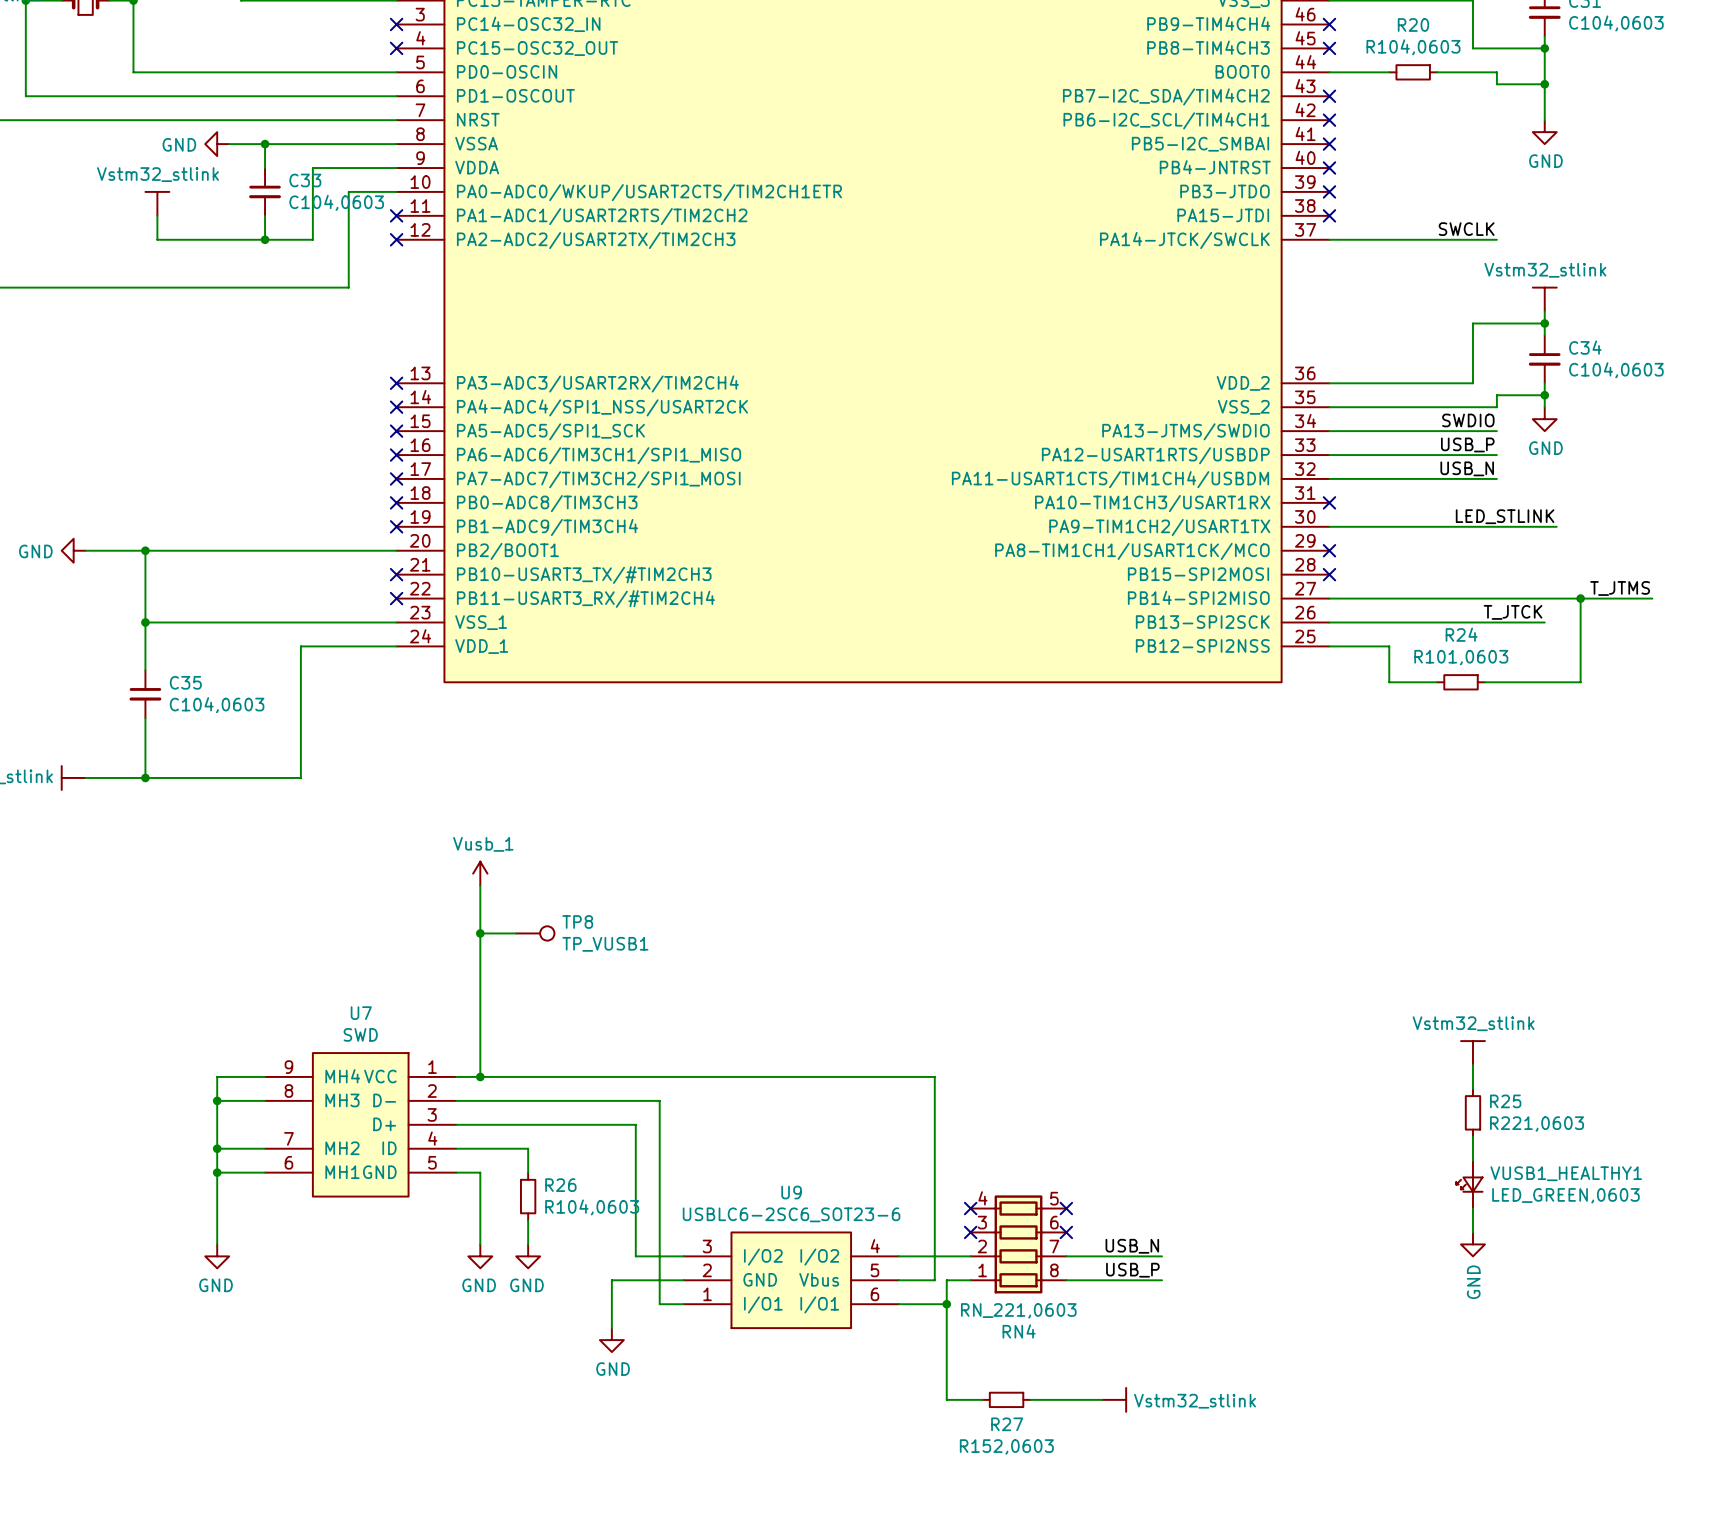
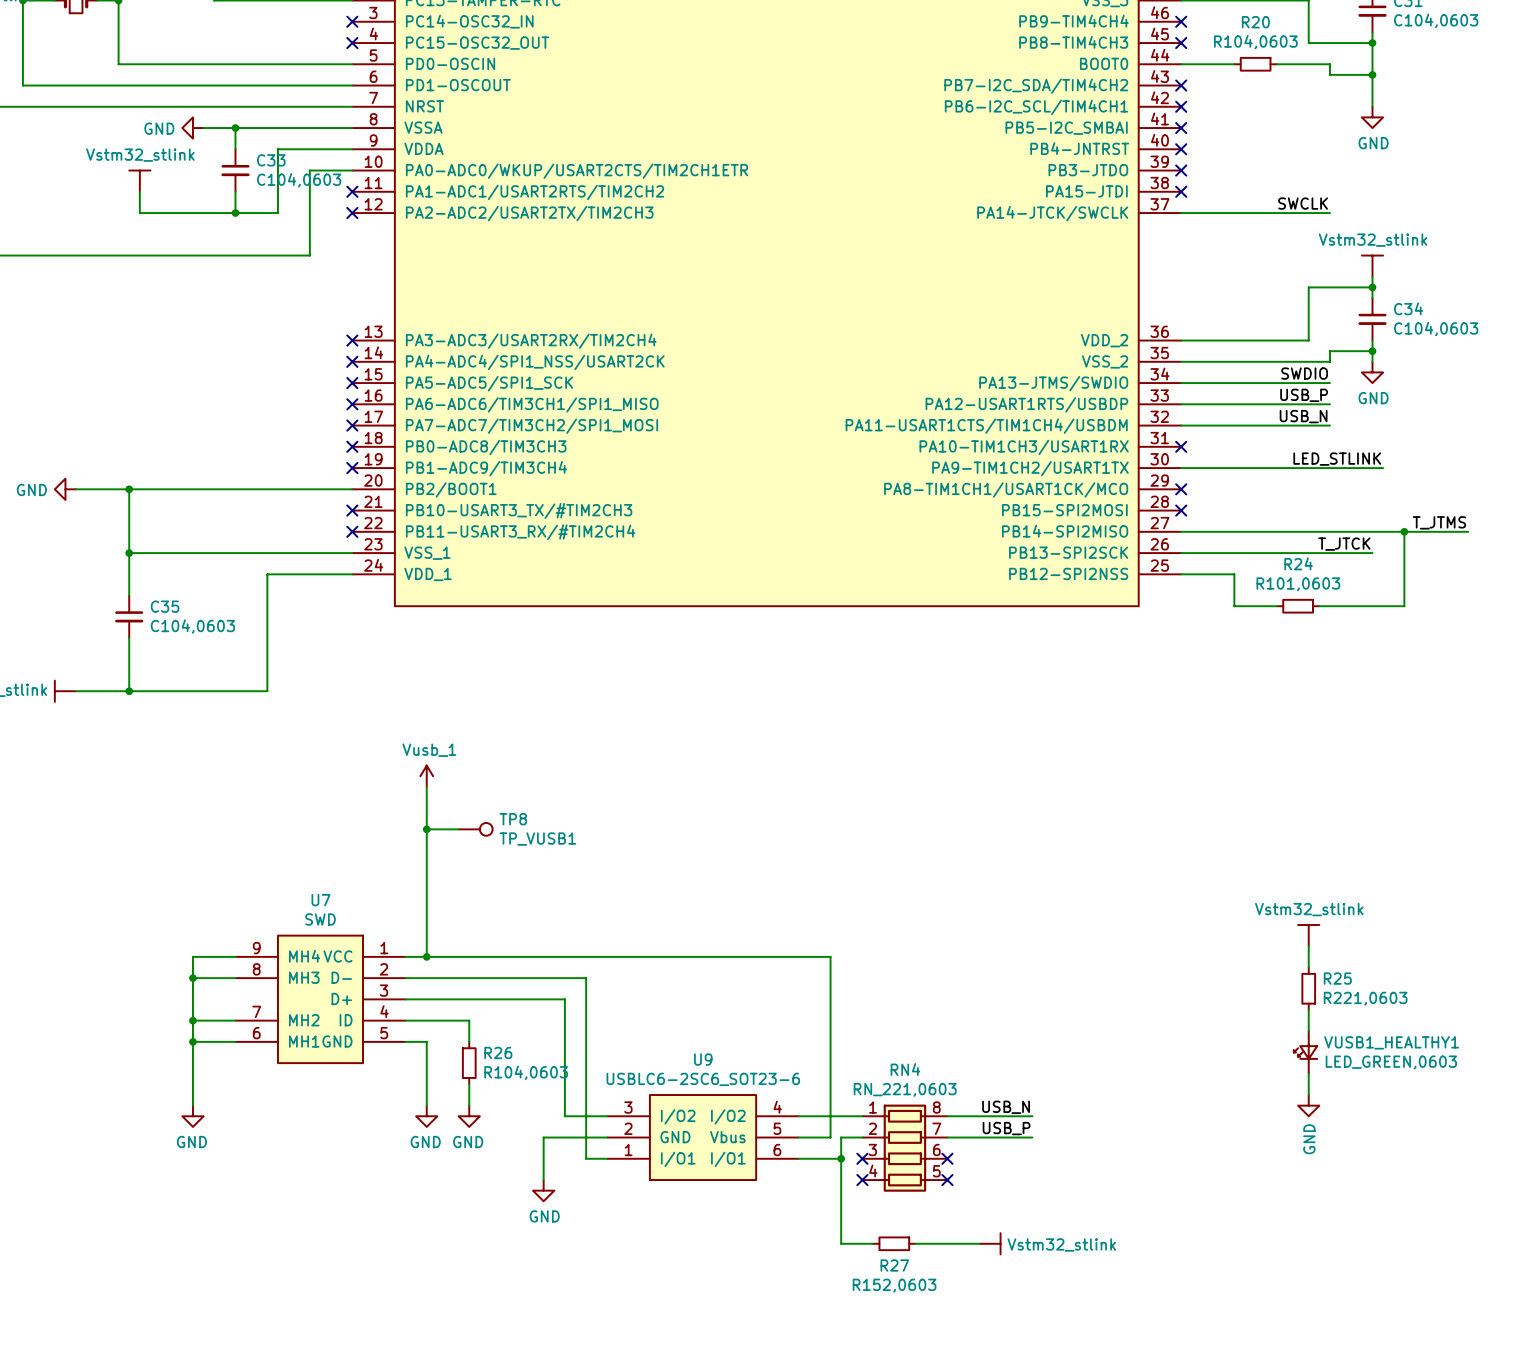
no-connect mark: (970, 1208) -> none
no-connect mark: (1066, 1208) -> none
no-connect mark: (970, 1232) -> none
no-connect mark: (1066, 1232) -> none
RN4 flip: as is (1018, 1244) -> up-down (904, 1148)
no-connect mark: none -> (862, 1158)
no-connect mark: none -> (947, 1158)
no-connect mark: none -> (862, 1180)
no-connect mark: none -> (947, 1180)

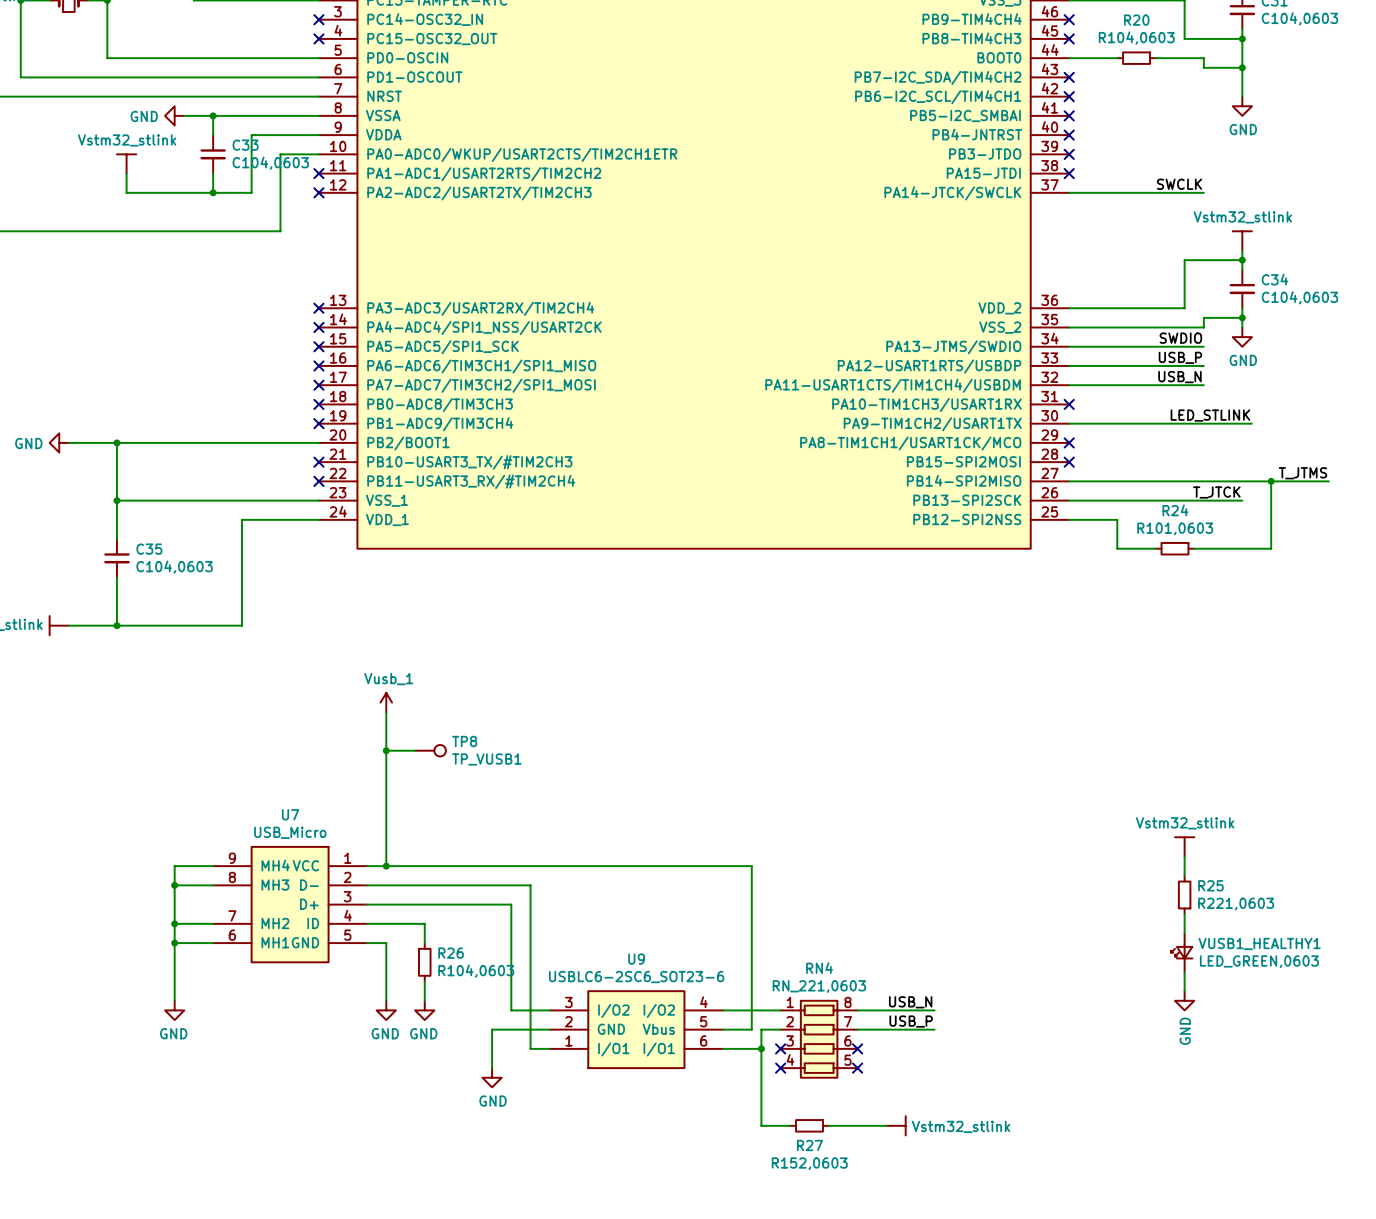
U7 value: SWD (320, 919) -> USB_Micro (290, 832)

